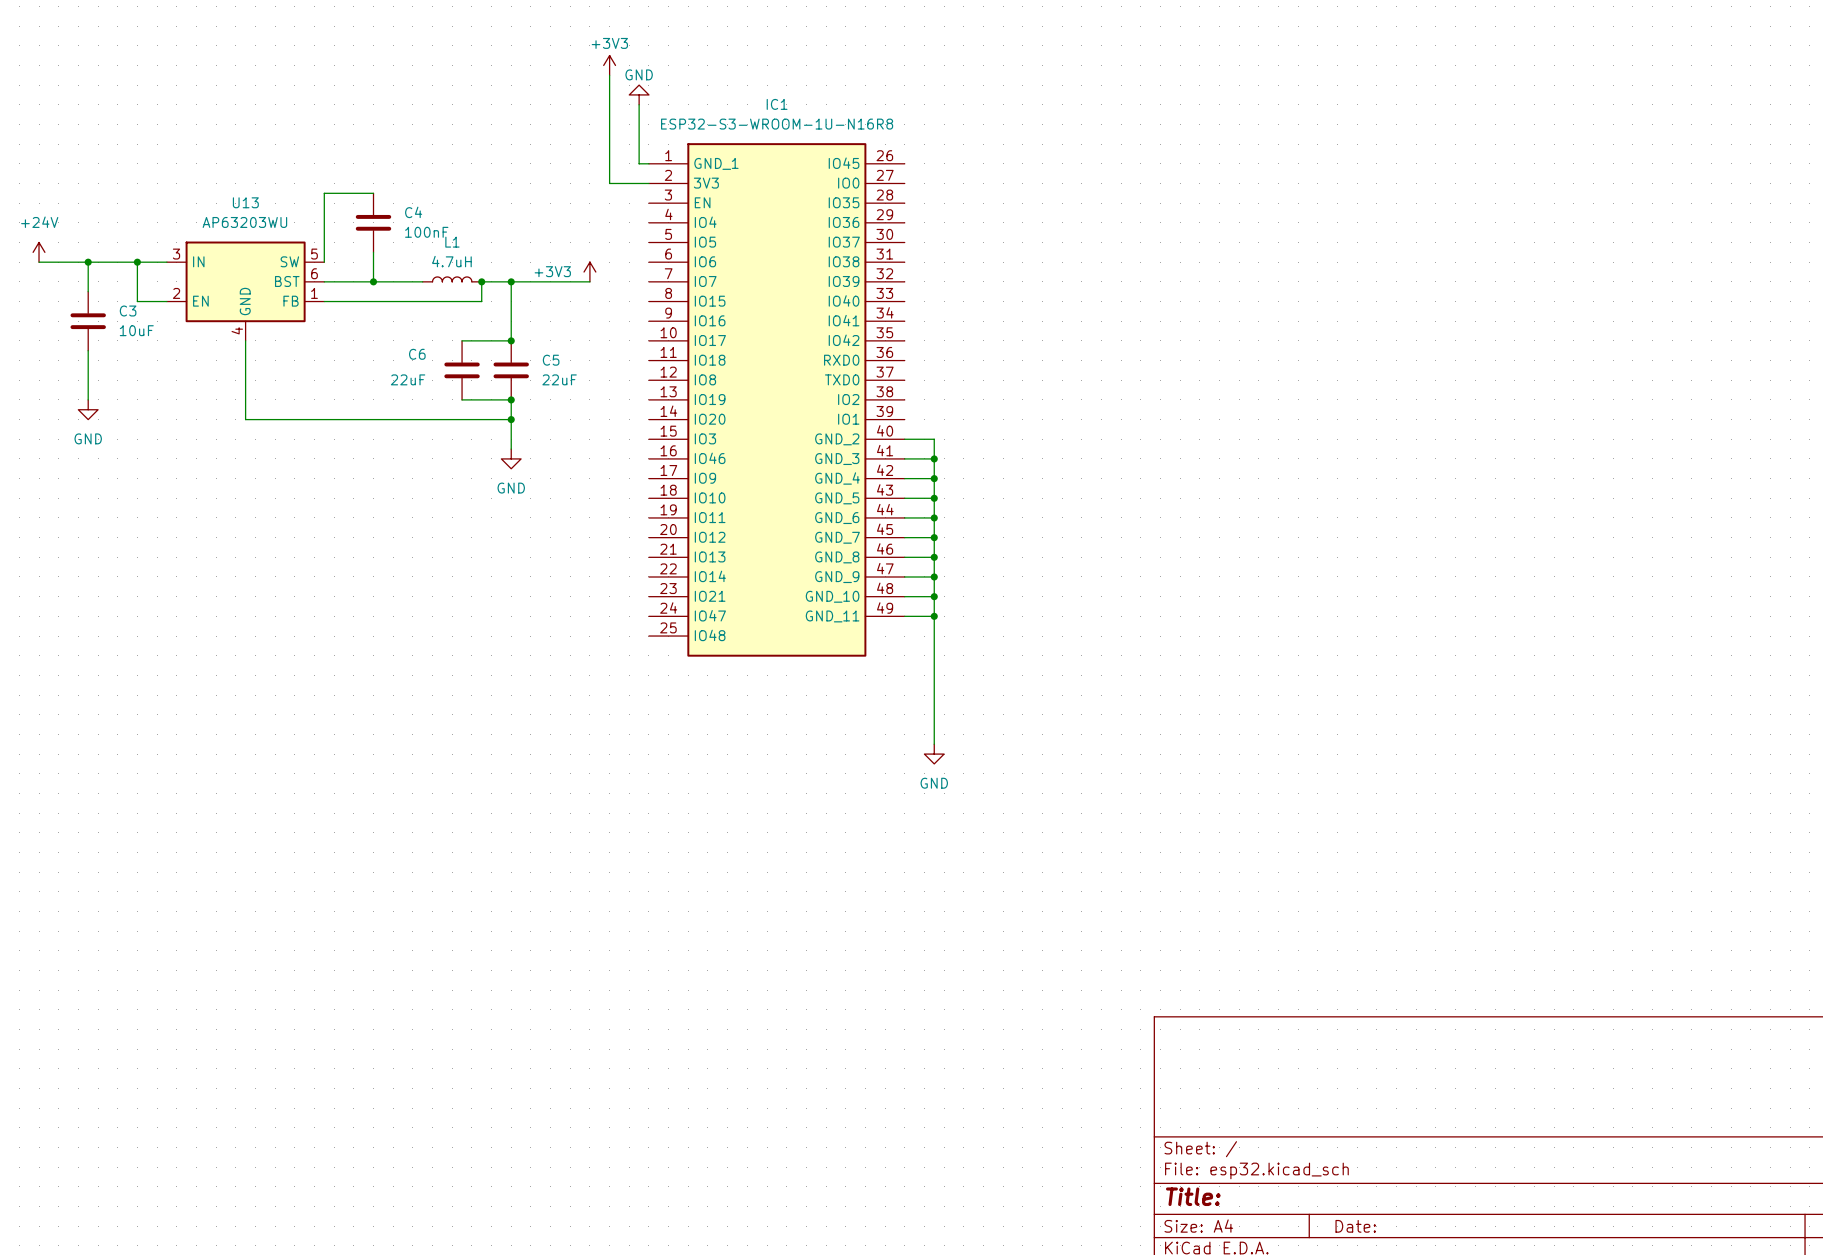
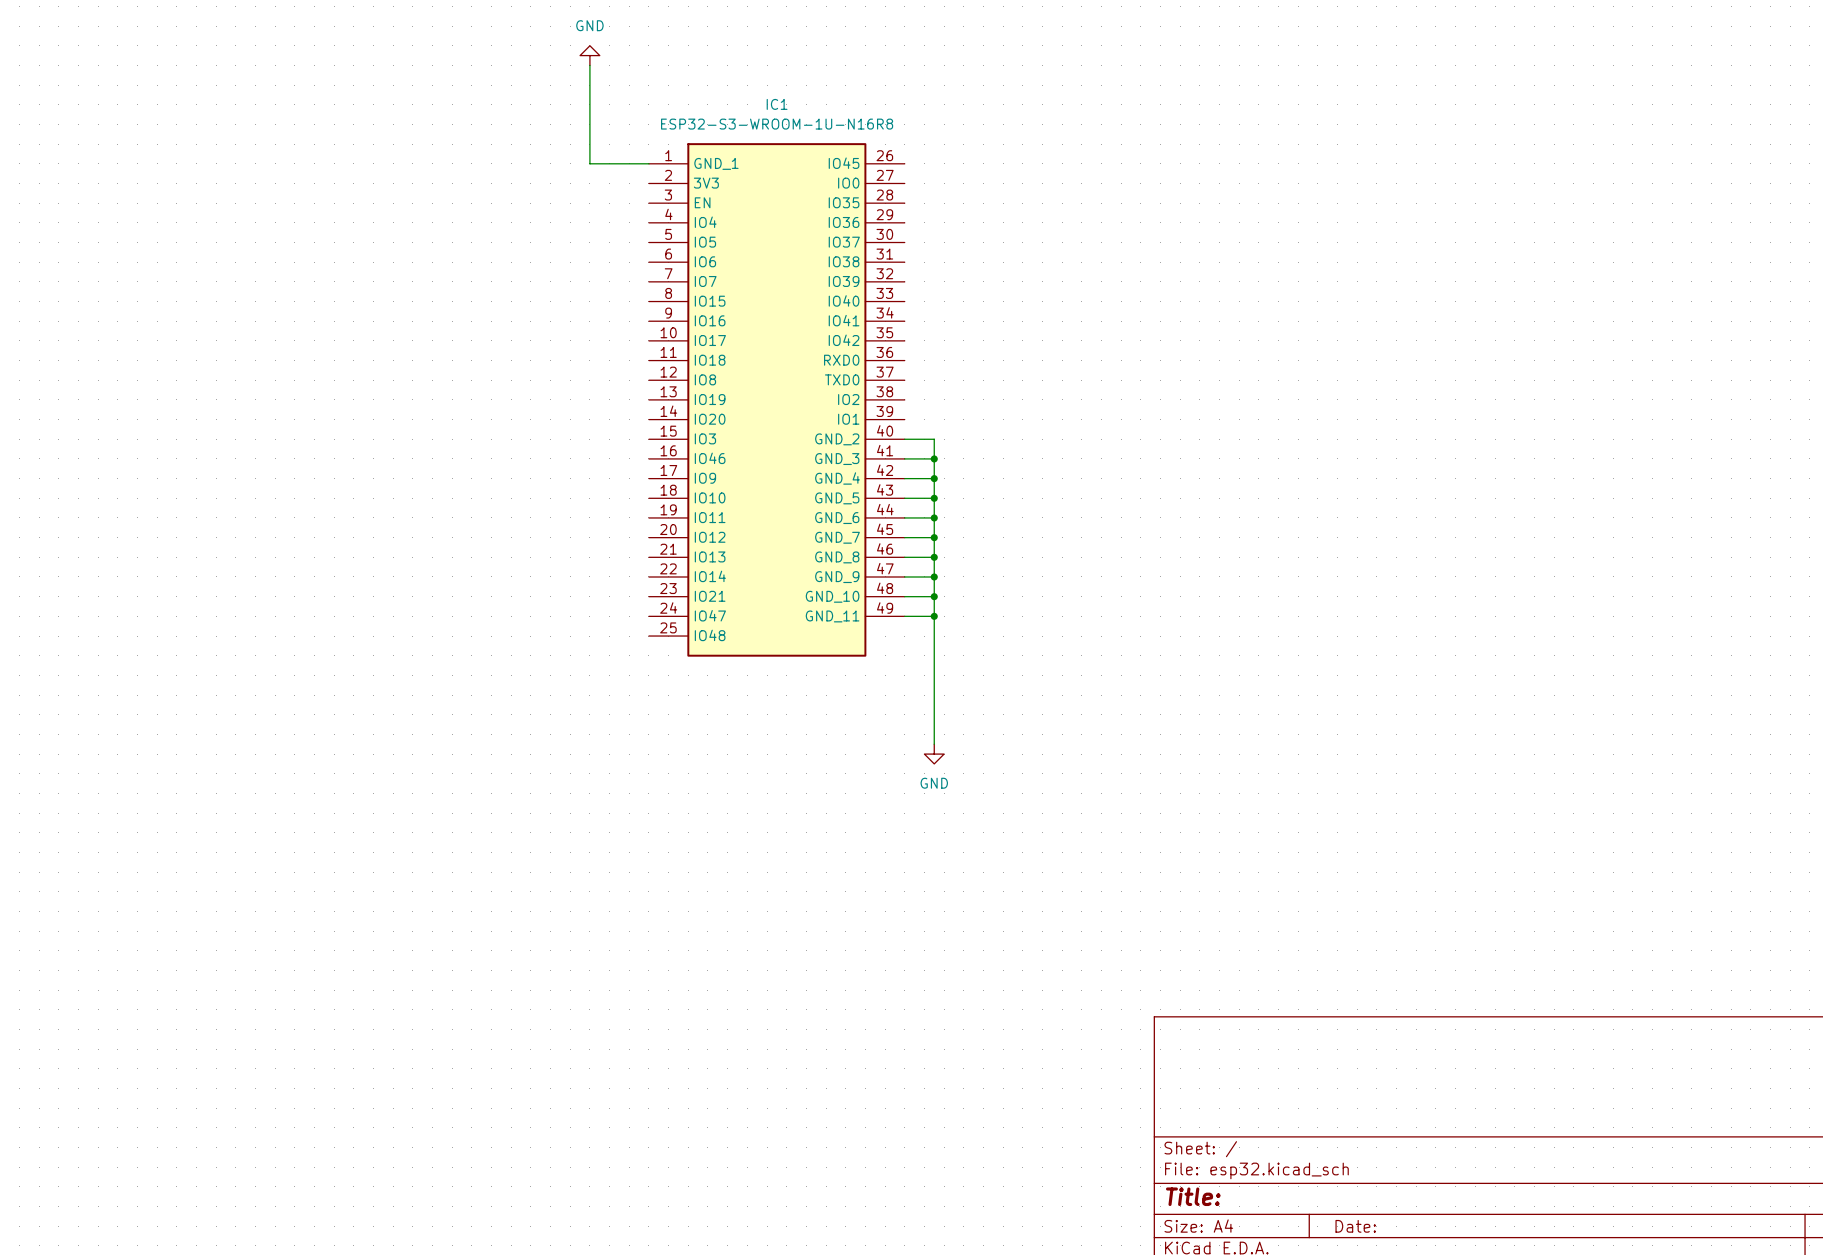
power symbol: +3V3 (609, 65) -> none
power symbol text position: GND (639, 74) -> GND (589, 25)
wire: (609, 75) (609, 183) (648, 183) -> none
power symbol position: GND (639, 94) -> GND (589, 55)
wire: (639, 104) (639, 163) -> (589, 65) (589, 163) (639, 163)
wire: (373, 193) (324, 193) (324, 262) -> none
C4: 100nF (373, 222) -> none
power symbol: +24V (39, 252) -> none
wire: (373, 252) (373, 281) -> none
wire: (39, 262) (166, 262) -> none
wire: (88, 262) (88, 291) -> none
junction: (88, 262) -> none
wire: (137, 262) (137, 301) (166, 301) -> none
junction: (137, 262) -> none
power symbol: +3V3 (589, 272) -> none
L1: 4.7uH (452, 279) -> none
wire: (324, 281) (422, 281) -> none
junction: (373, 281) -> none
junction: (481, 281) -> none
wire: (511, 281) (511, 340) (462, 340) -> none
junction: (511, 281) -> none
wire: (589, 281) (481, 281) (481, 301) (324, 301) -> none
U13: AP63203WU (245, 291) -> none
C3: 10uF (88, 321) -> none
wire: (245, 340) (245, 419) (511, 419) -> none
junction: (511, 340) -> none
wire: (88, 350) (88, 399) -> none
C6: 22uF (462, 370) -> none
C5: 22uF (511, 370) -> none
wire: (462, 399) (511, 399) (511, 449) -> none
junction: (511, 399) -> none
power symbol: GND (88, 409) -> none
junction: (511, 419) -> none
power symbol: GND (511, 458) -> none

